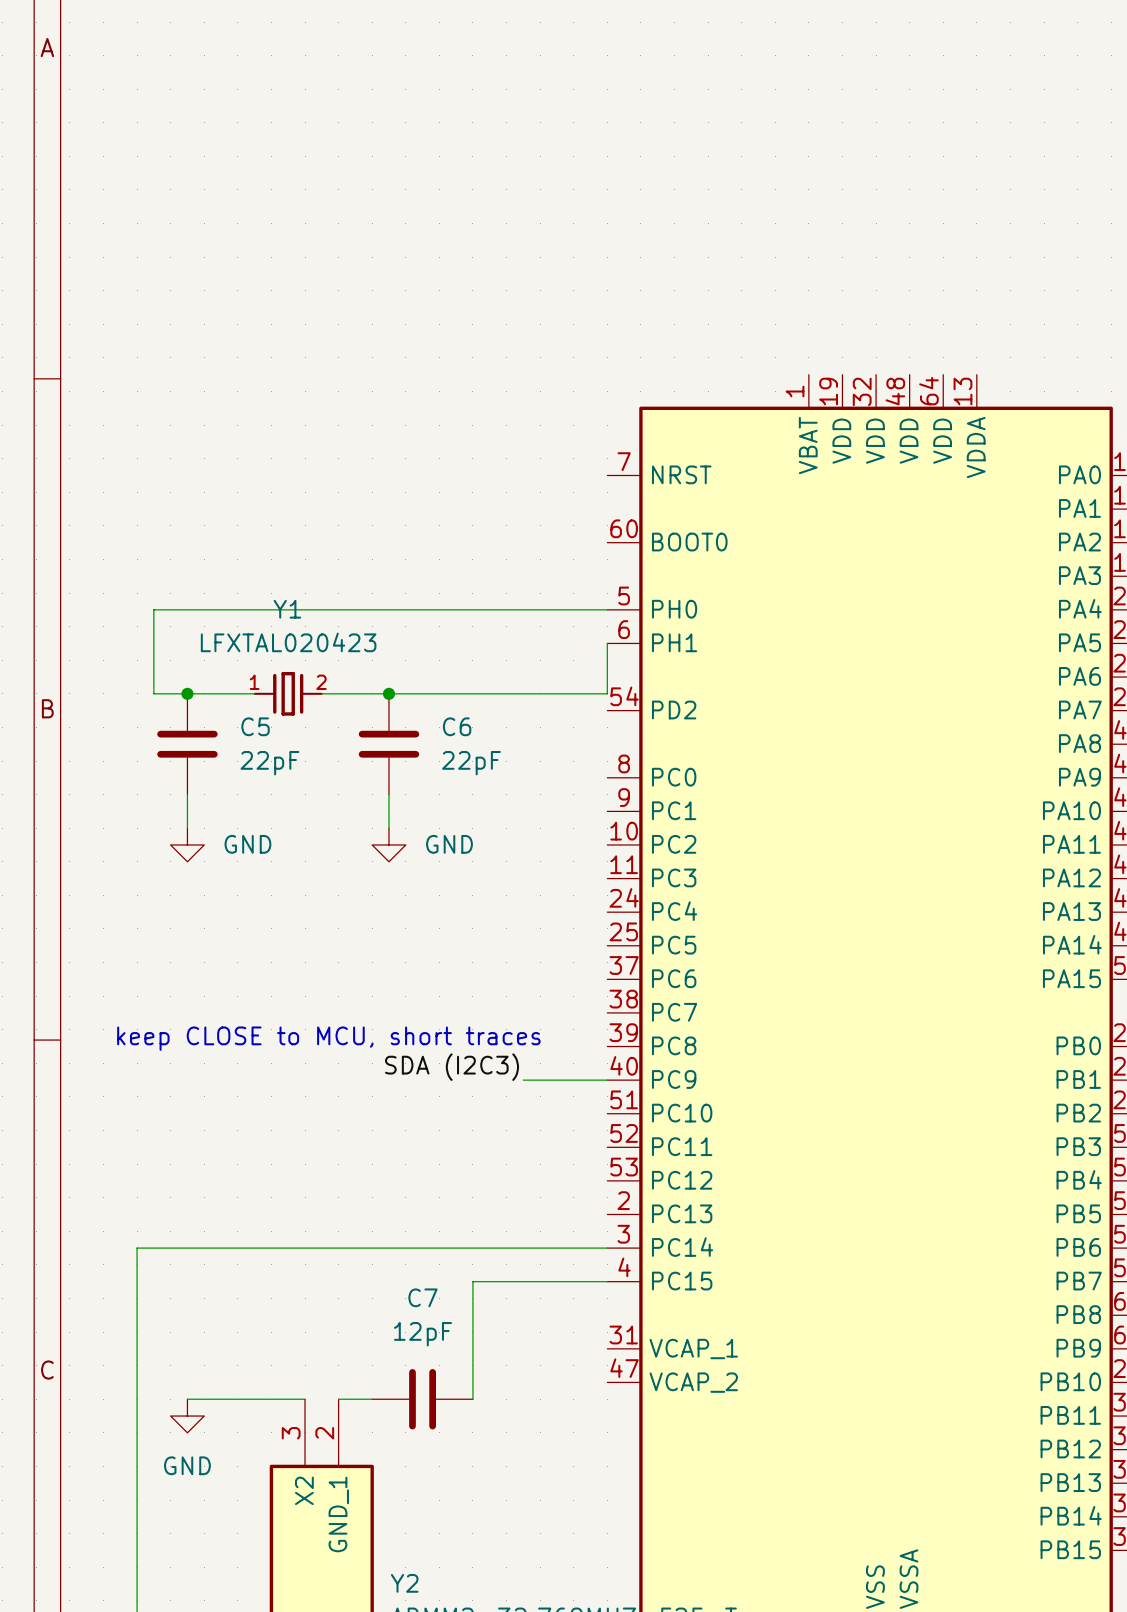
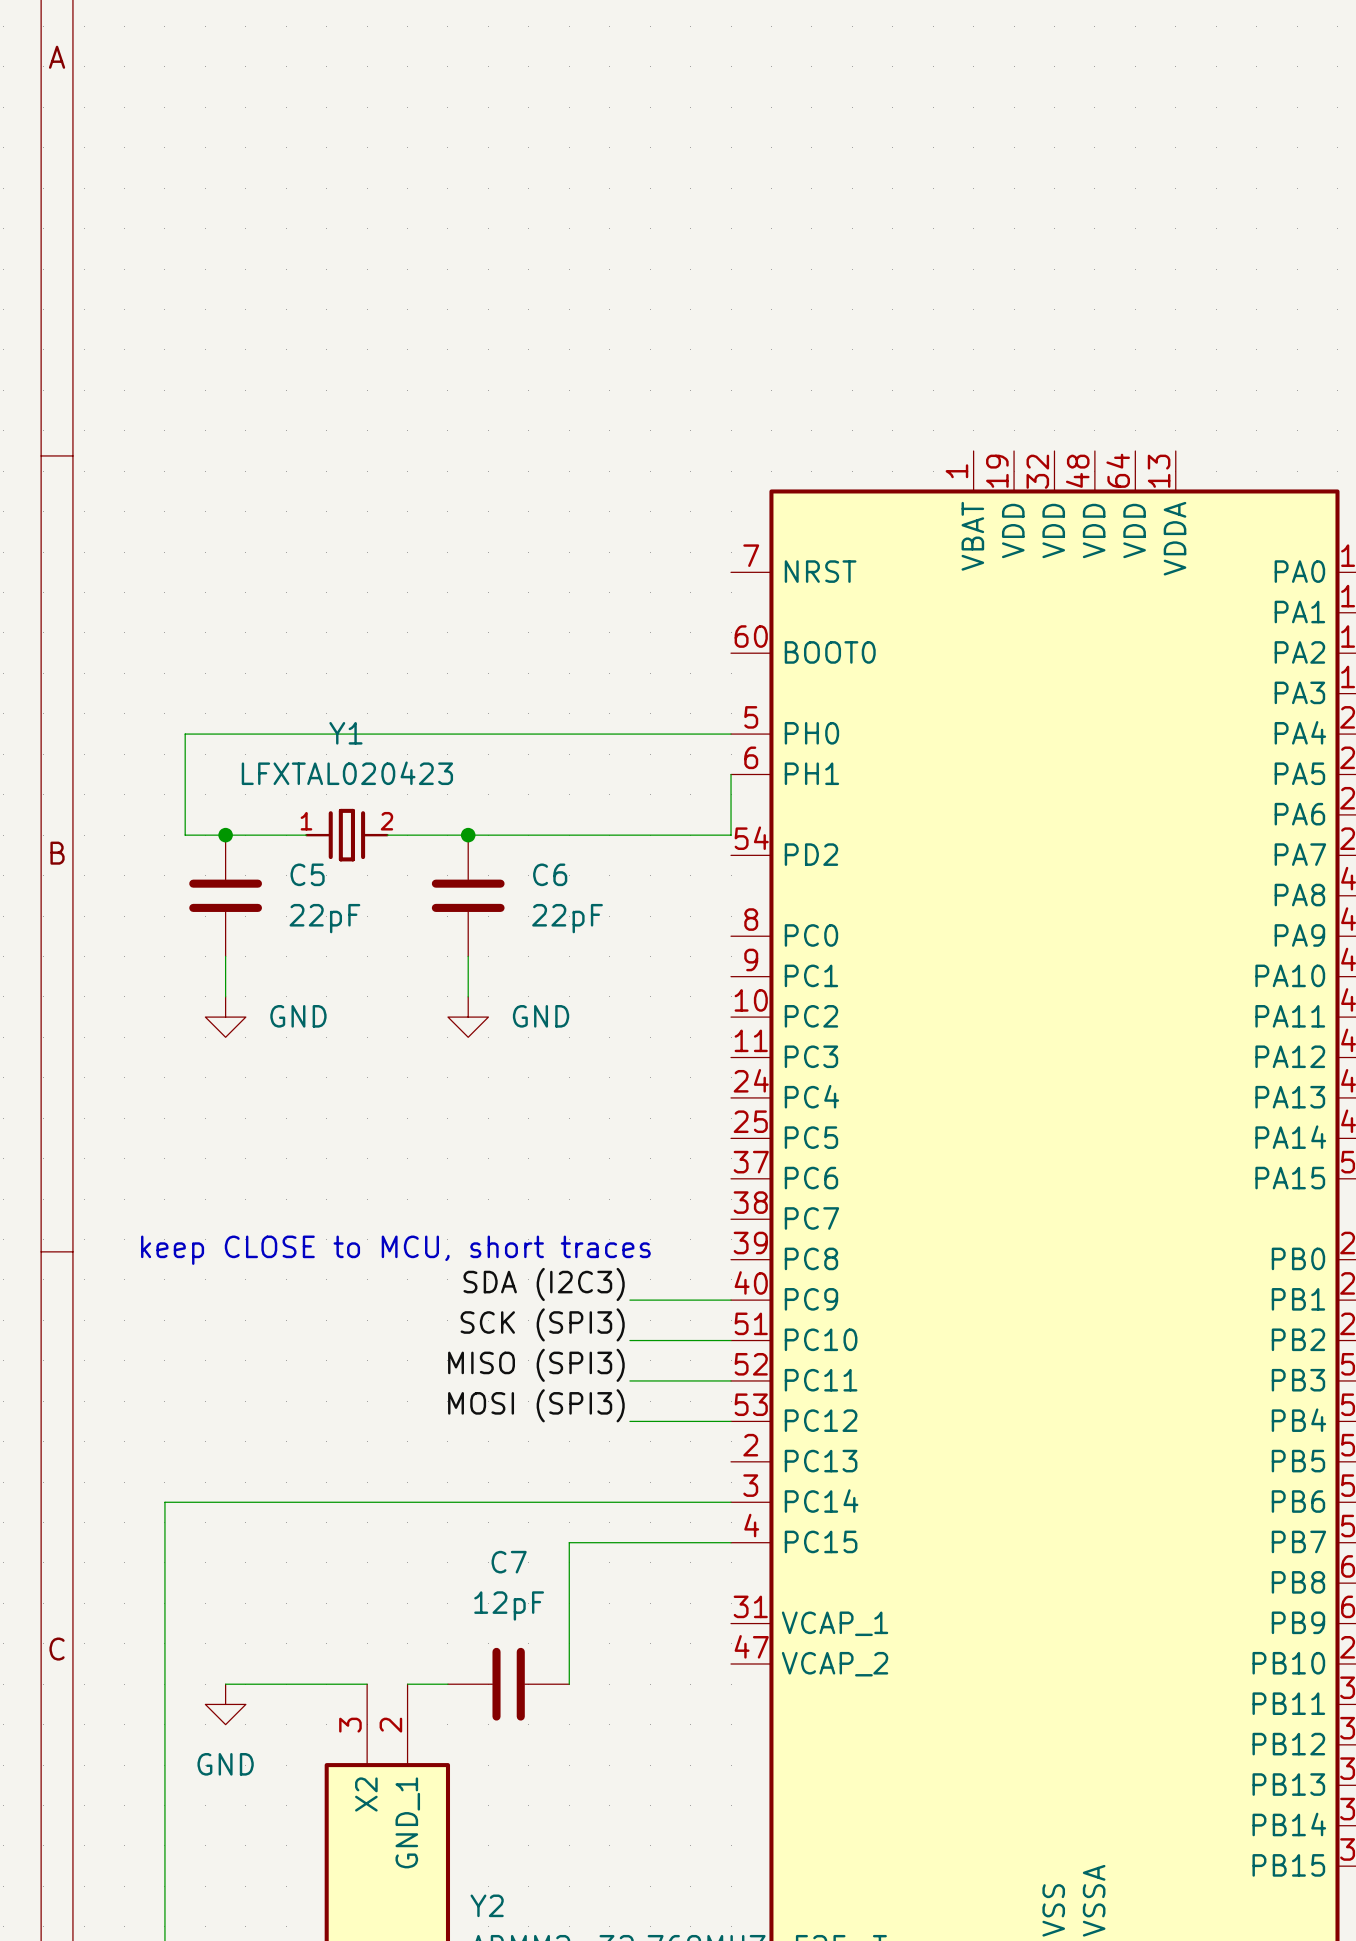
label: none -> SCK (SPI3) (542, 1324)
wire: none -> (629, 1340) (731, 1340)
label: none -> MISO (SPI3) (536, 1365)
wire: none -> (629, 1380) (731, 1380)
label: none -> MOSI (SPI3) (536, 1405)
wire: none -> (629, 1421) (731, 1421)

